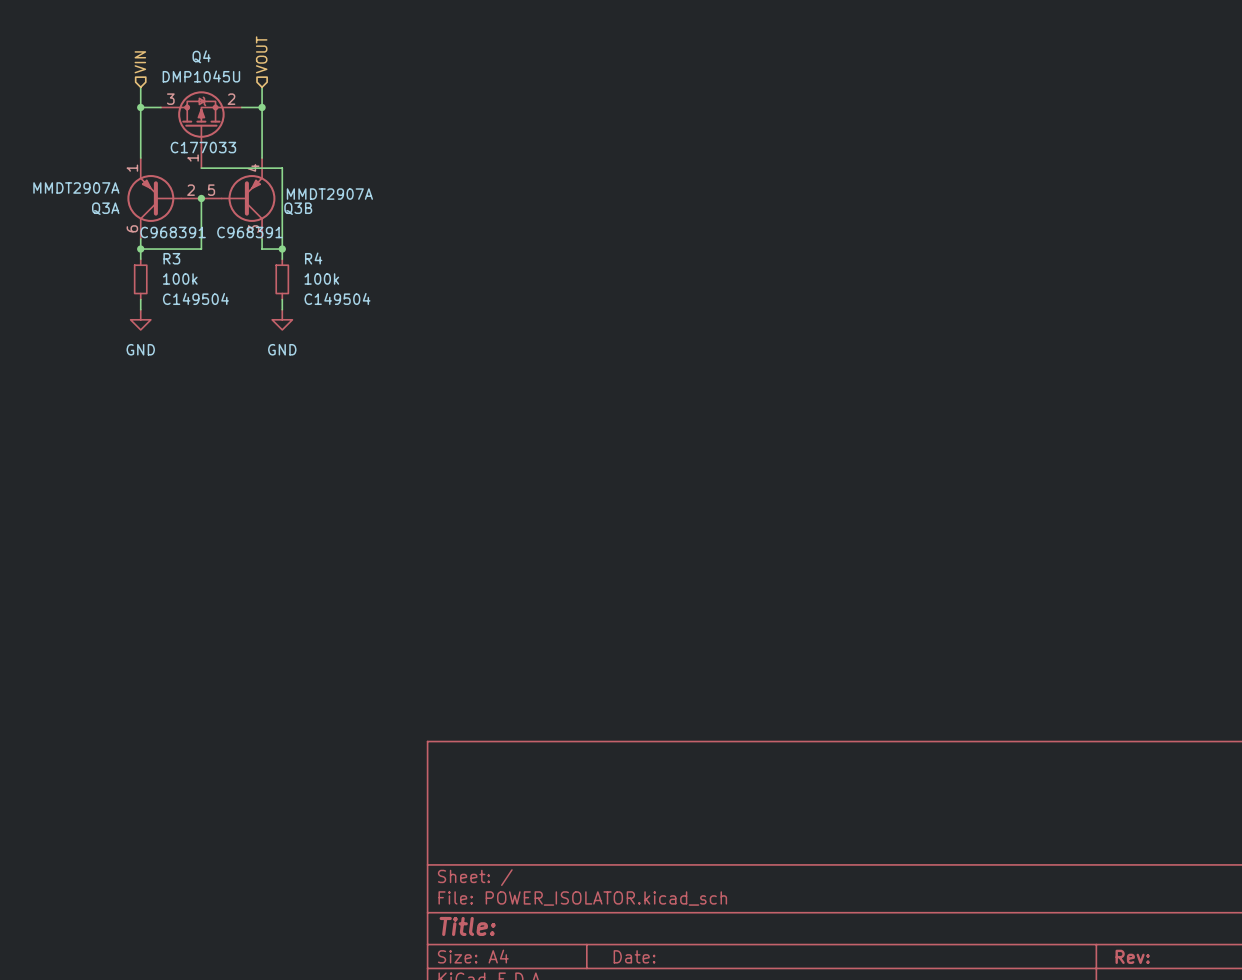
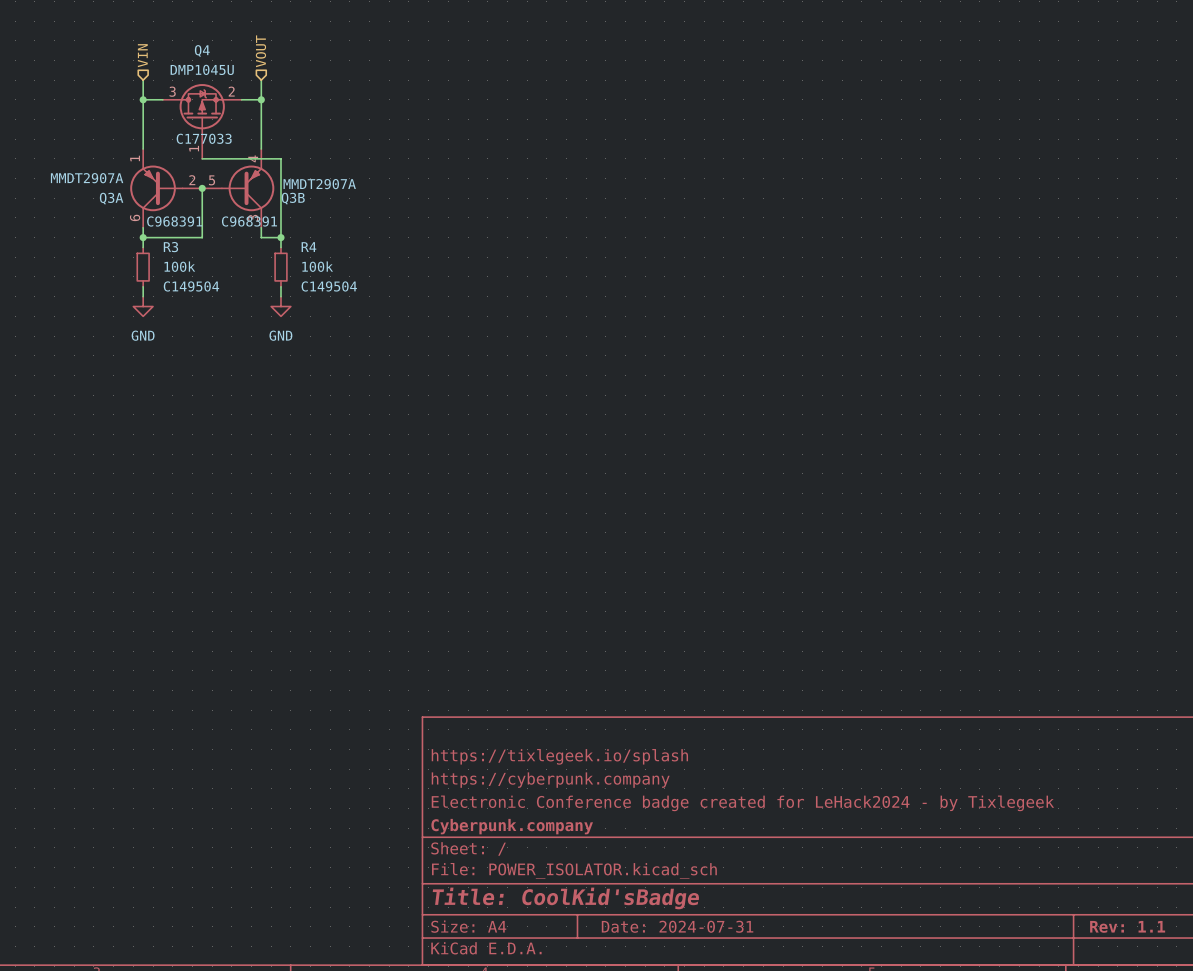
title block: none -> https://tixlegeek.io/splash (559, 756)
title block: none -> https://cyberpunk.company (550, 780)
title block: none -> Electronic Conference badge created for LeHack2024 - by Tixlegeek (742, 803)
title block: none -> Cyberpunk.company (512, 826)
title block: Title: (467, 926) -> Title: CoolKid'sBadge (566, 898)
title block: Date: (634, 956) -> Date: 2024-07-31 (677, 926)
title block: Rev: (1132, 956) -> Rev: 1.1 (1127, 926)

